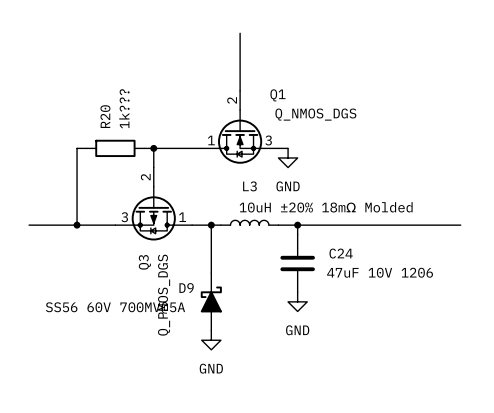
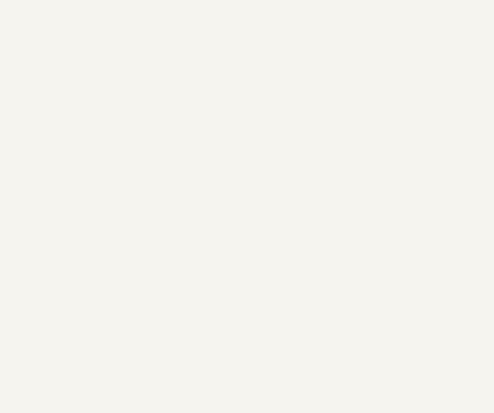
wire: (240, 33) (240, 90) -> none
Q1: Q_NMOS_DGS (240, 127) -> none
wire: (86, 148) (77, 148) (77, 225) -> none
R20: 1k??? (115, 148) -> none
wire: (144, 148) (201, 148) -> none
wire: (153, 148) (153, 167) -> none
junction: (153, 148) -> none
wire: (278, 148) (288, 148) -> none
power symbol: GND (288, 157) -> none
Q3: Q_PMOS_DGS (153, 204) -> none
L3: 10uH ±20% 18mΩ Molded (249, 222) -> none
wire: (29, 225) (115, 225) -> none
junction: (77, 225) -> none
wire: (192, 225) (220, 225) -> none
wire: (211, 225) (211, 273) -> none
junction: (211, 225) -> none
wire: (278, 225) (460, 225) -> none
wire: (297, 225) (297, 234) -> none
junction: (297, 225) -> none
C24: 47uF 10V 1206 (297, 263) -> none
D9: SS56 60V 700MV@5A (211, 301) -> none
power symbol: GND (297, 301) -> none
power symbol: GND (211, 340) -> none

